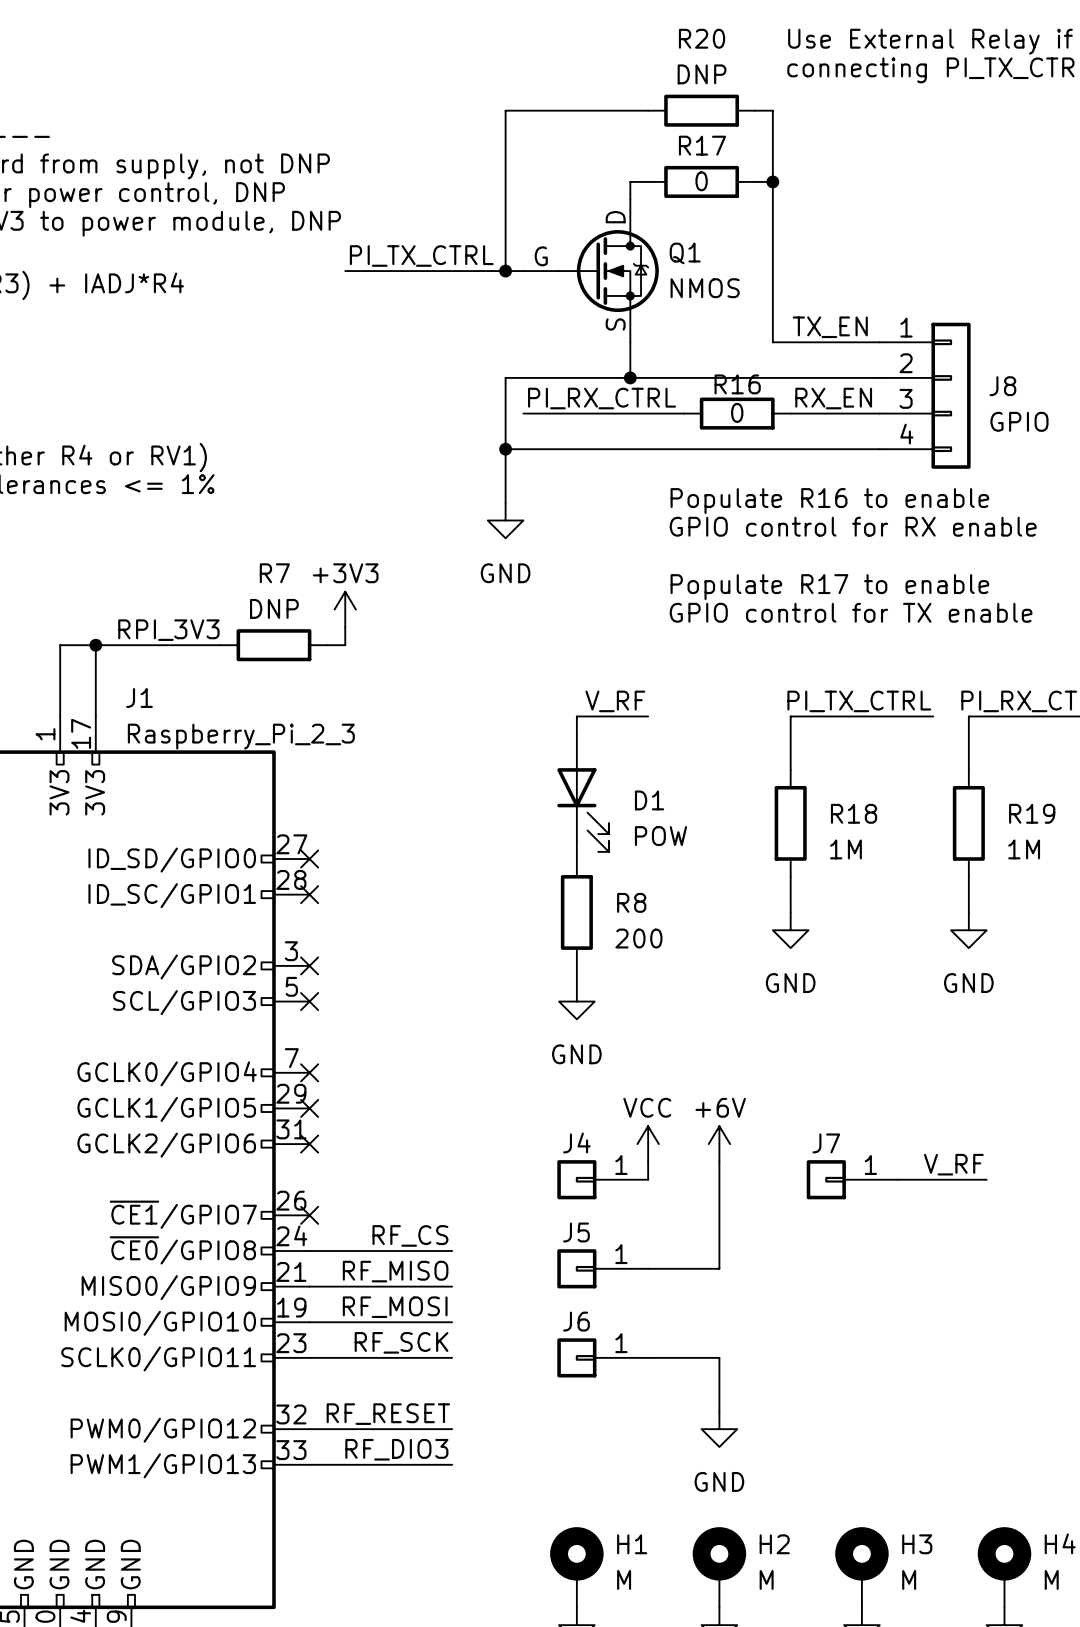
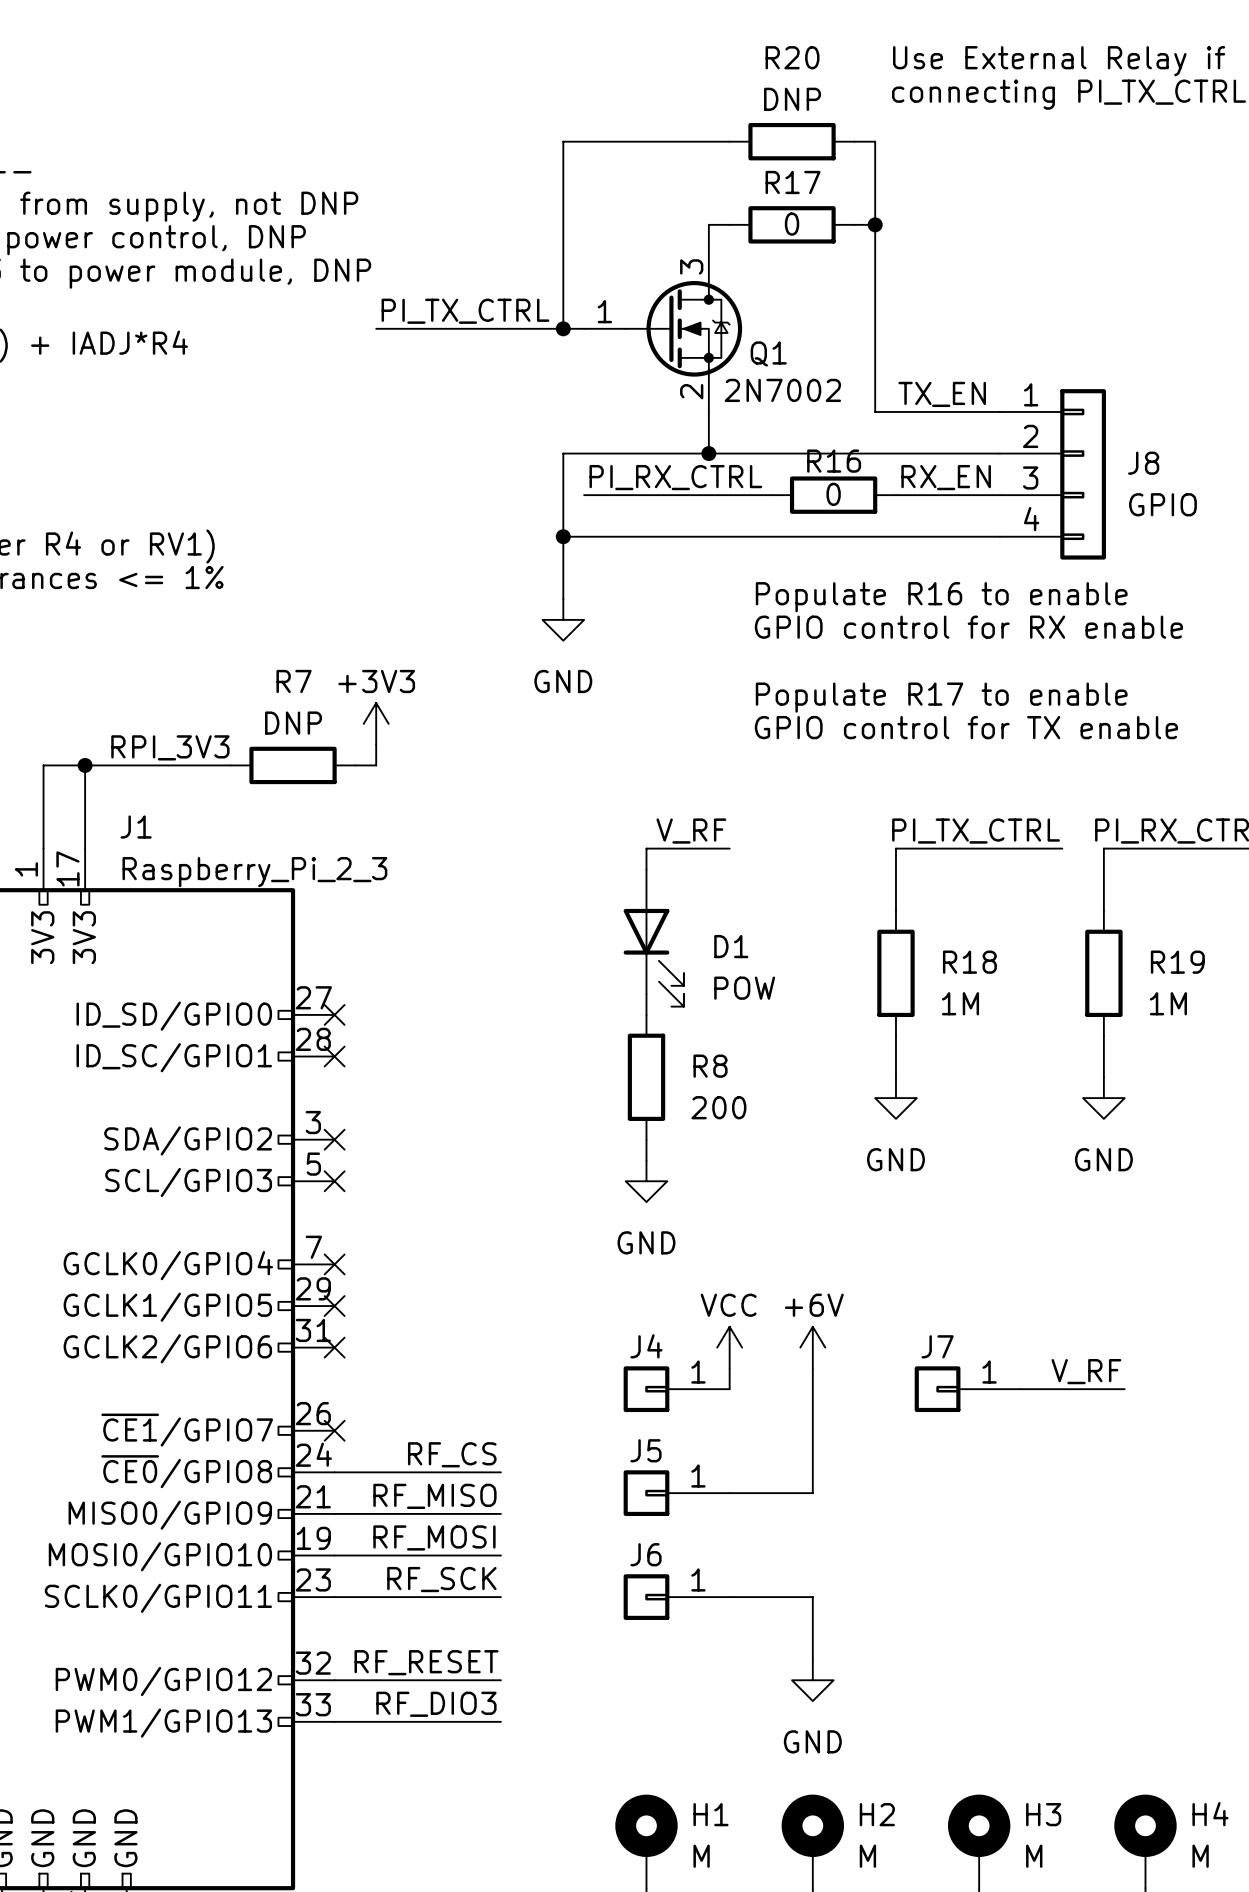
Q1 pin name: D (615, 217) -> none
Q1 pin number: none -> 3 (691, 266)
Q1 name position: Q1 (685, 253) -> Q1 (768, 353)
Q1 pin name: G (541, 256) -> none
Q1 pin number: none -> 1 (604, 311)
Q1 value: NMOS (705, 288) -> 2N7002 (782, 390)
Q1 pin name: S (615, 324) -> none
Q1 pin number: none -> 2 (691, 391)

